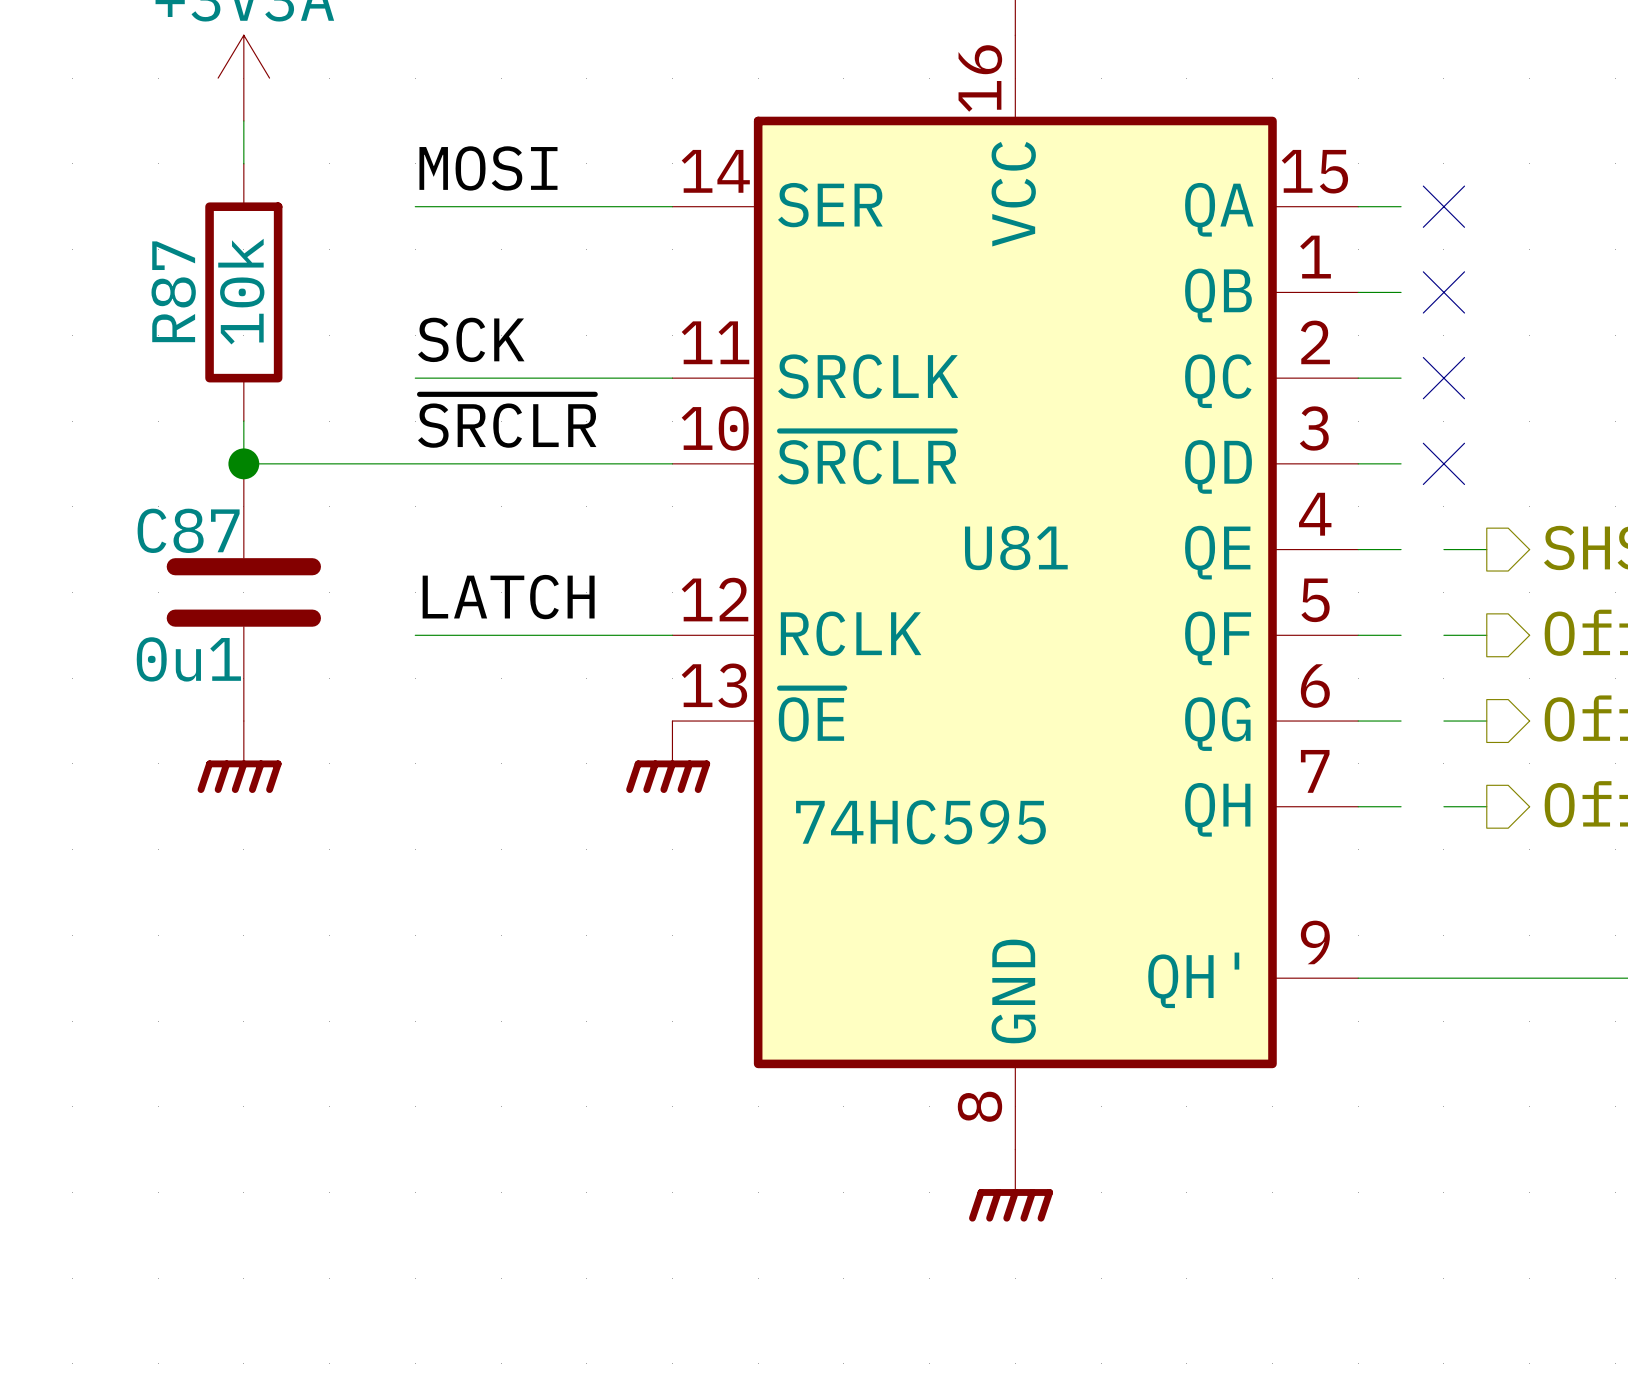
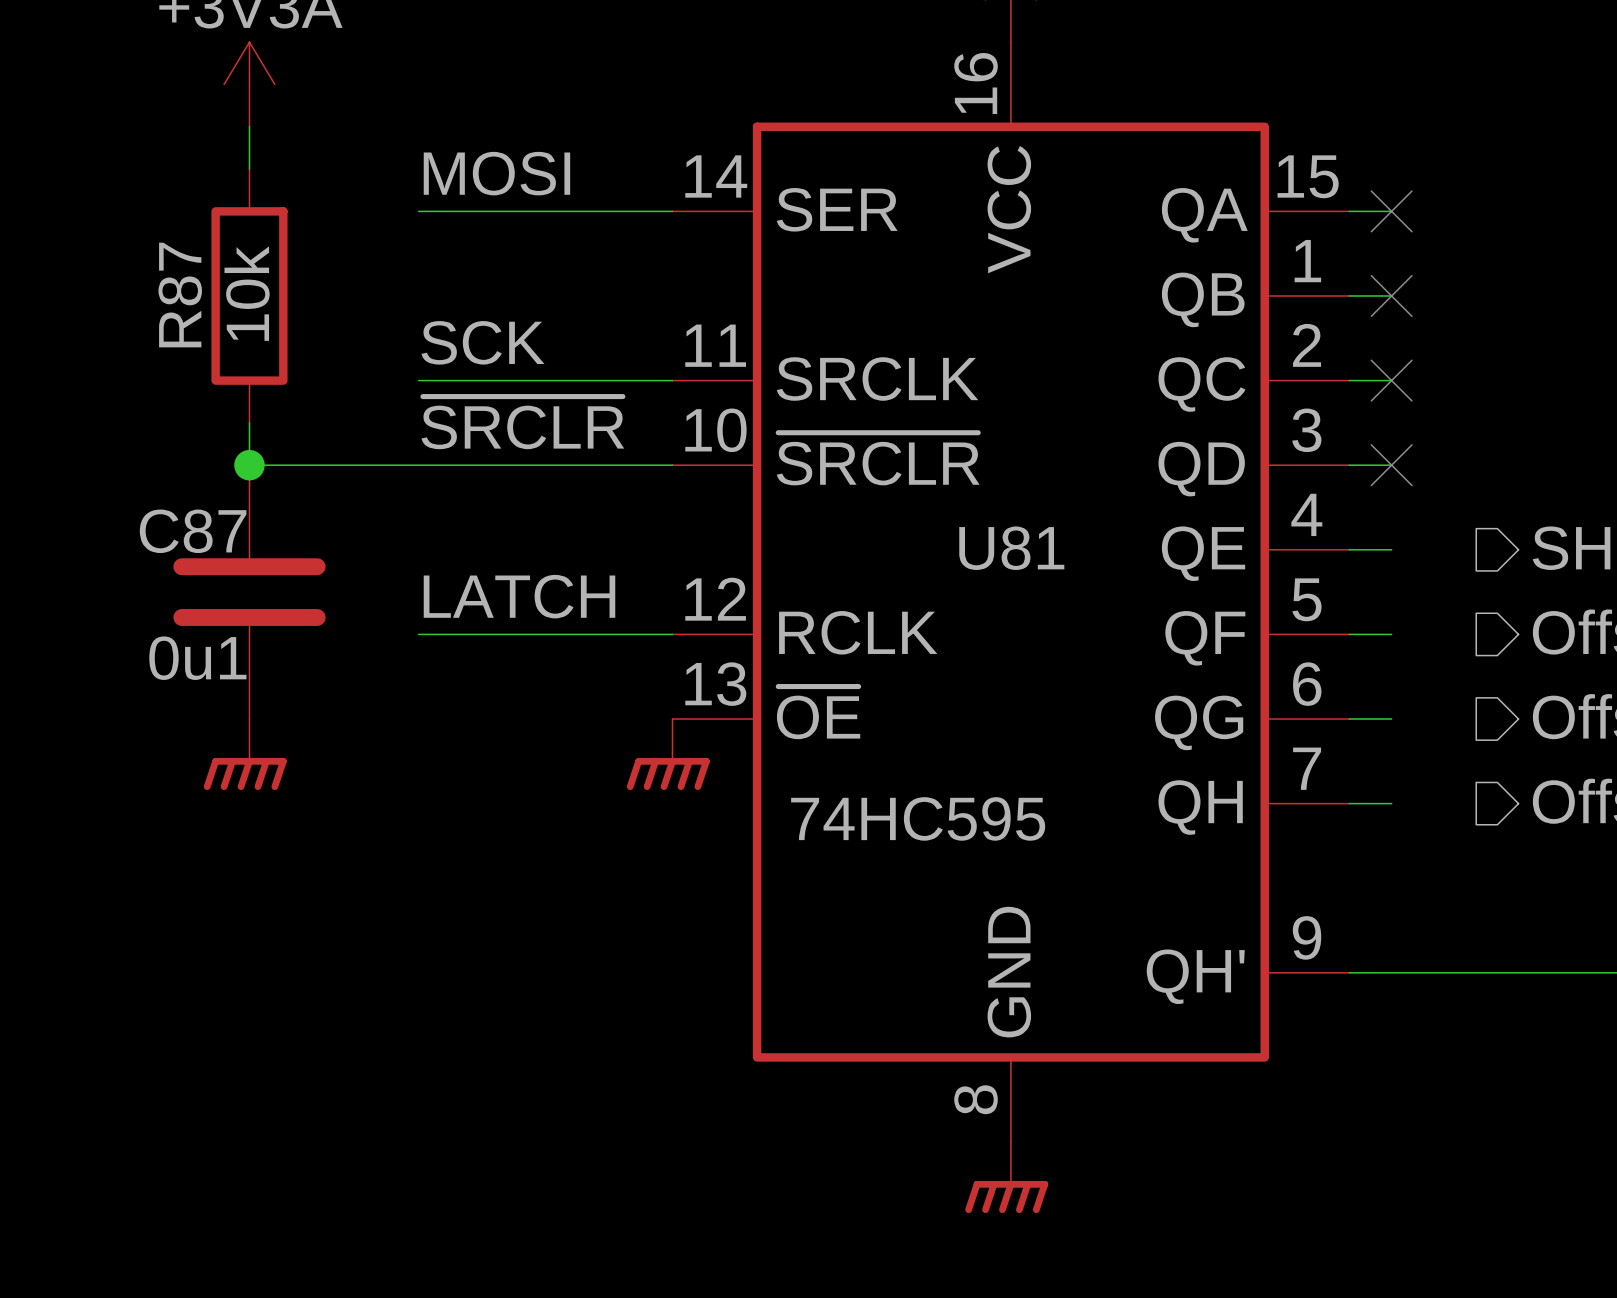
no-connect mark position: (1443, 206) -> (1391, 211)
no-connect mark position: (1443, 292) -> (1391, 295)
no-connect mark position: (1443, 378) -> (1391, 380)
no-connect mark position: (1443, 463) -> (1391, 465)
wire: (1443, 549) (1486, 549) -> none
wire: (1443, 635) (1486, 635) -> none
wire: (1443, 721) (1486, 721) -> none
wire: (1443, 806) (1486, 806) -> none

